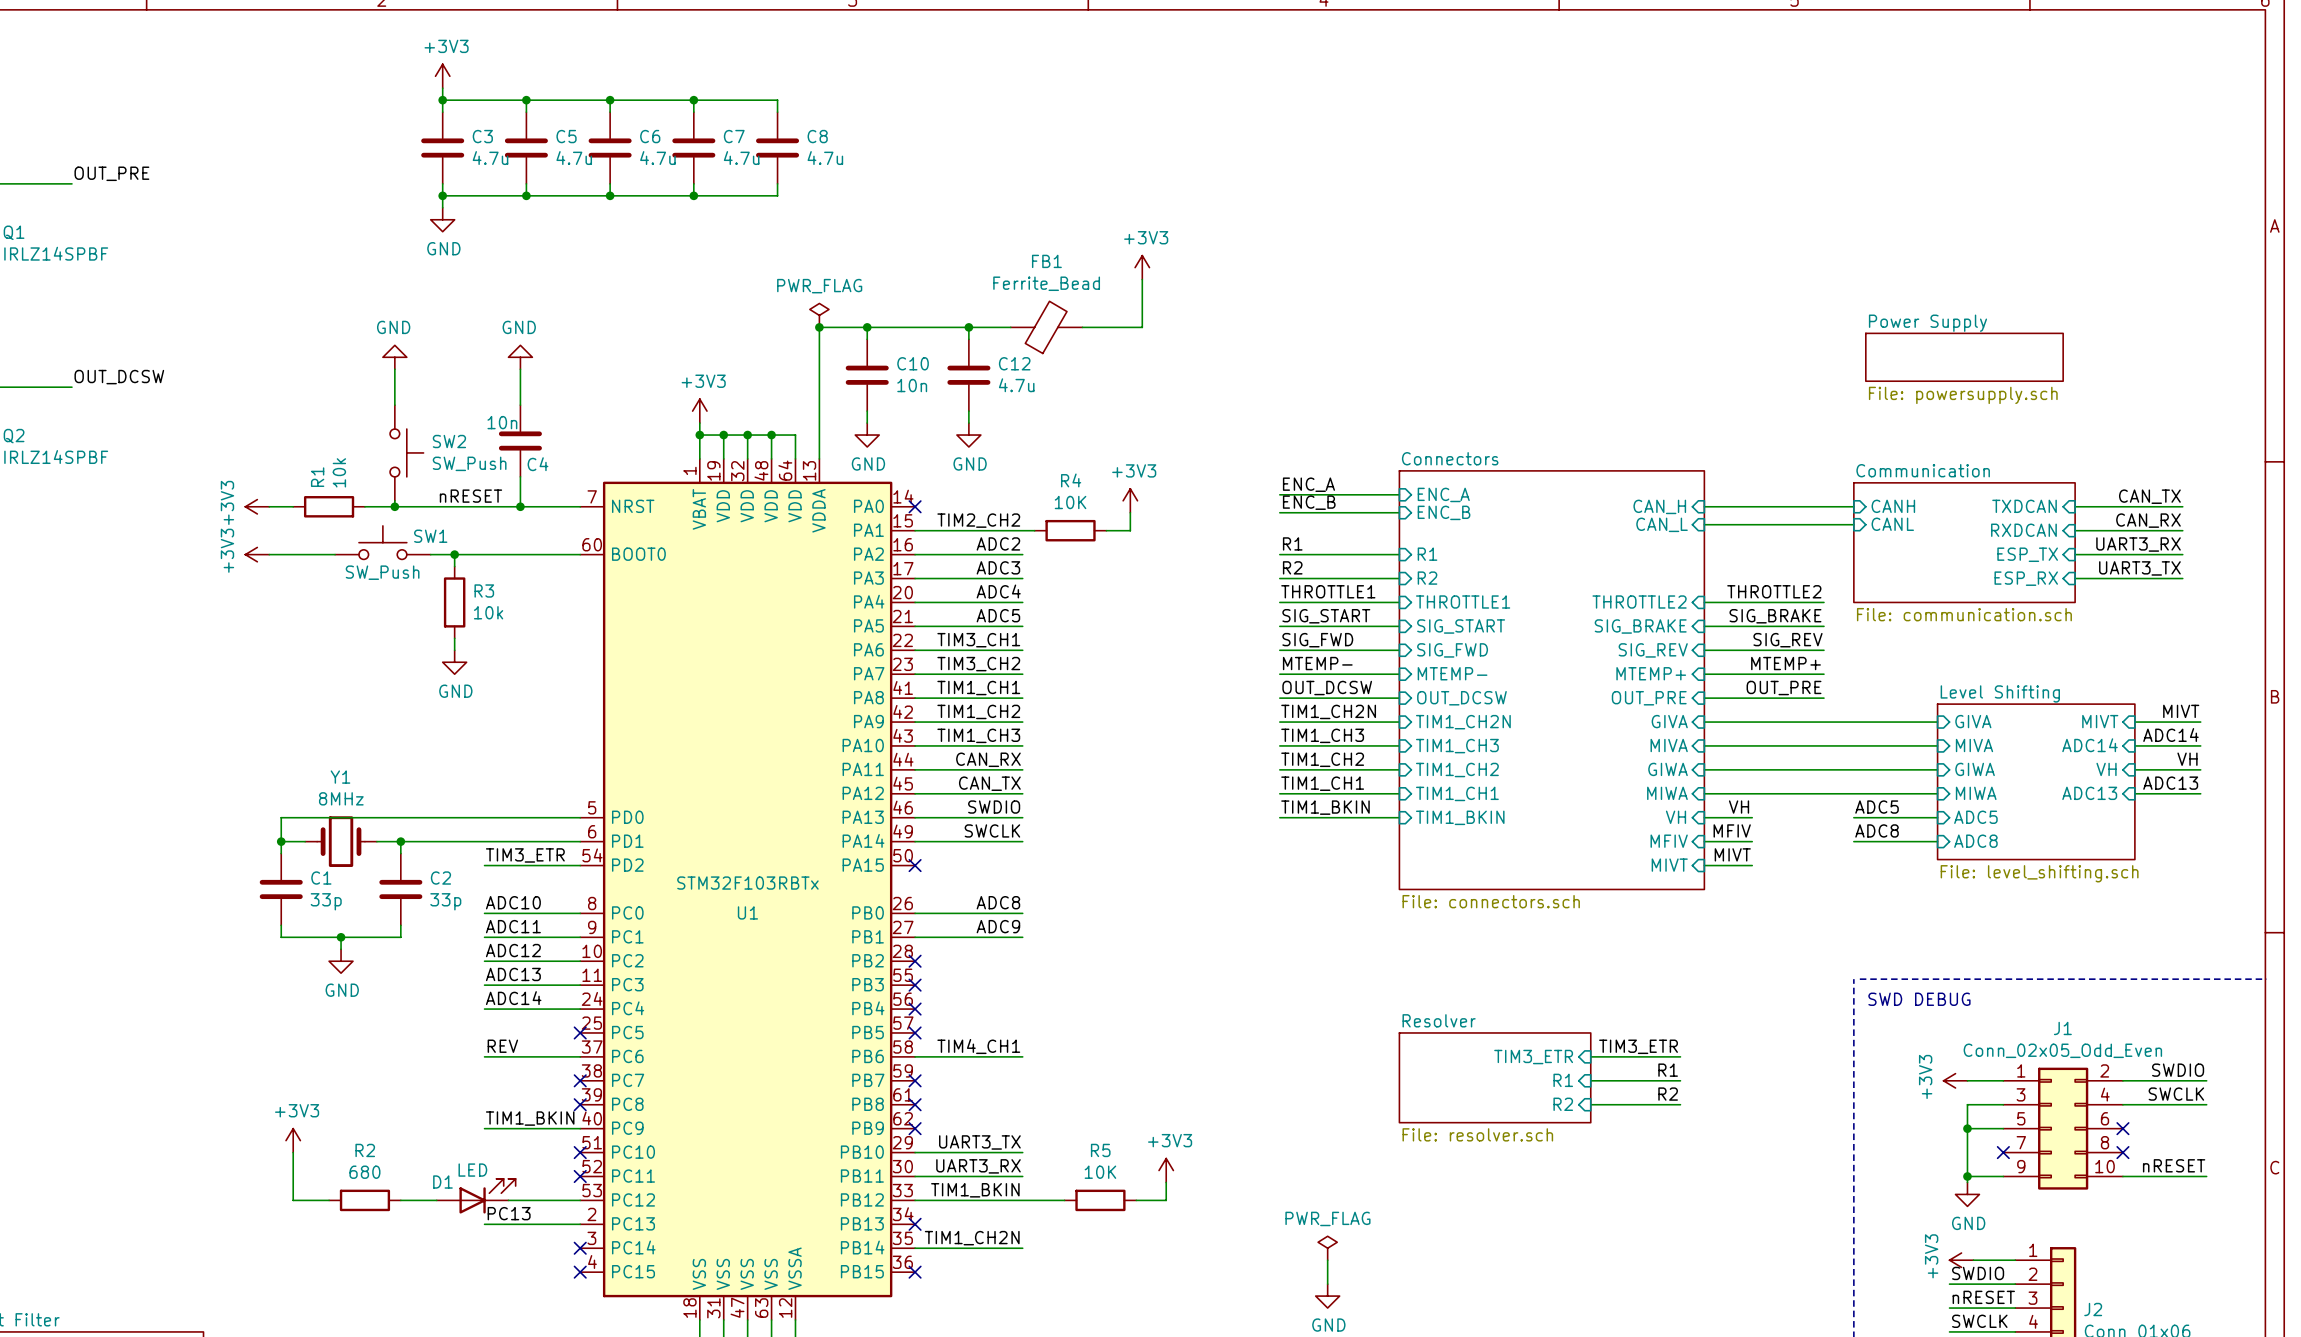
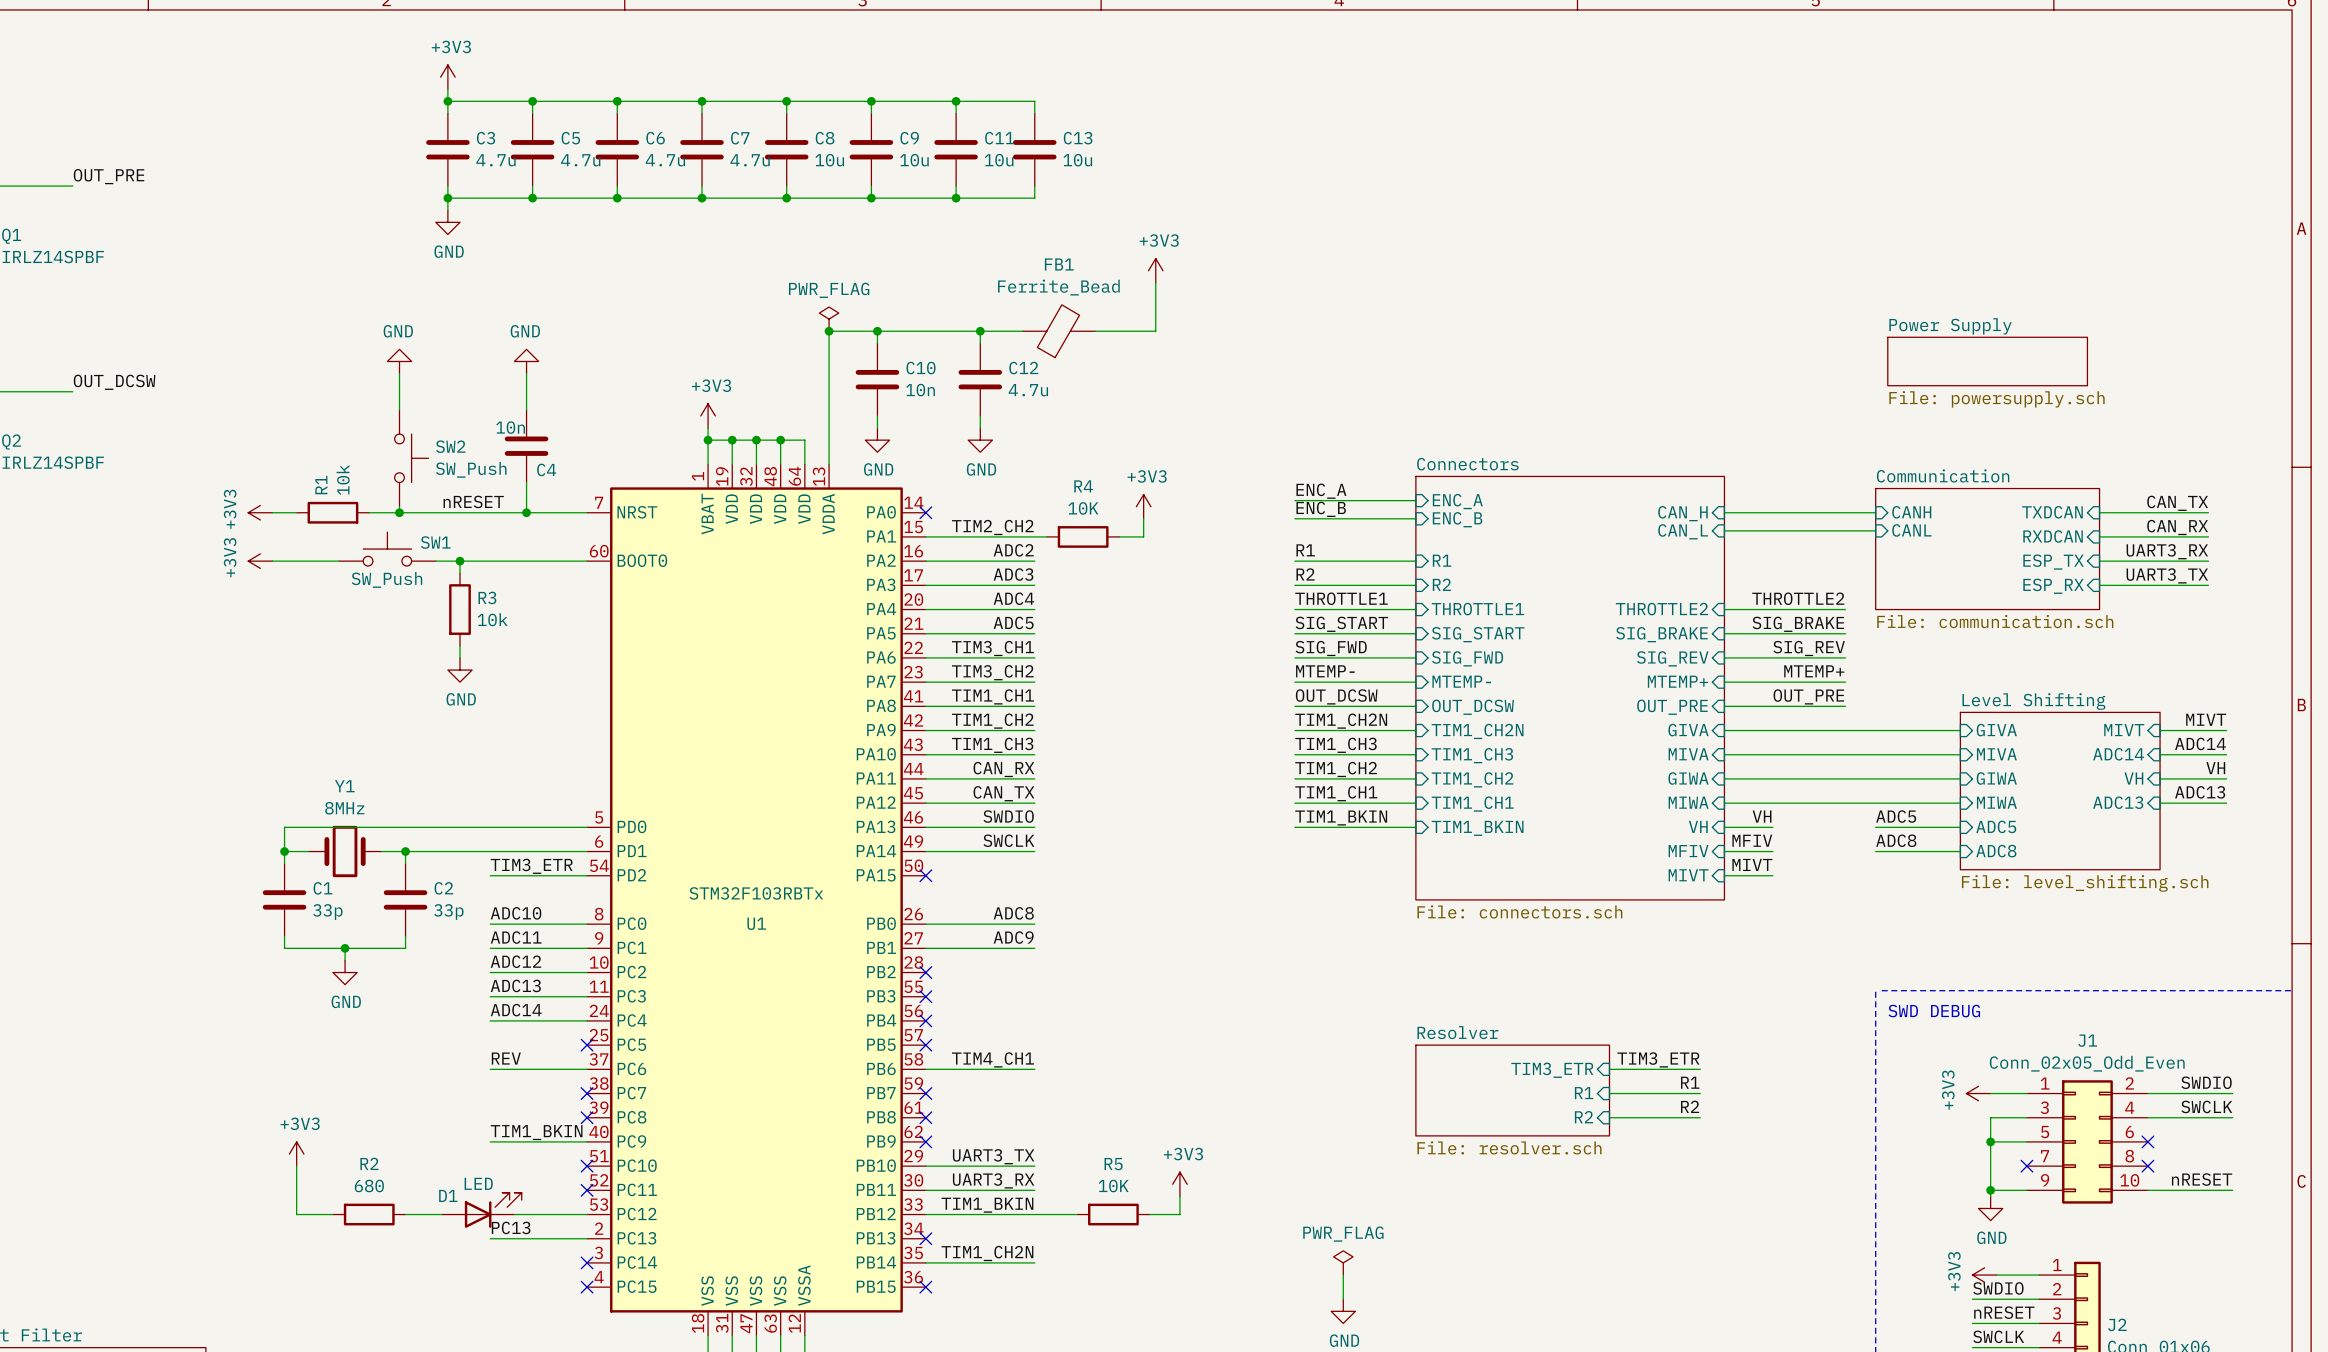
wire: none -> (786, 101) (1034, 101) (1034, 113)
junction: none -> (786, 101)
wire: none -> (871, 101) (871, 113)
junction: none -> (871, 101)
wire: none -> (956, 101) (956, 113)
junction: none -> (956, 101)
C9: none -> 10u (871, 149)
C11: none -> 10u (956, 149)
C13: none -> 10u (1034, 149)
C8 value: 4.7u (825, 158) -> 10u (829, 160)
wire: none -> (871, 186) (871, 198)
wire: none -> (956, 186) (956, 198)
wire: none -> (1034, 186) (1034, 198) (786, 198)
junction: none -> (786, 198)
junction: none -> (871, 198)
junction: none -> (956, 198)

